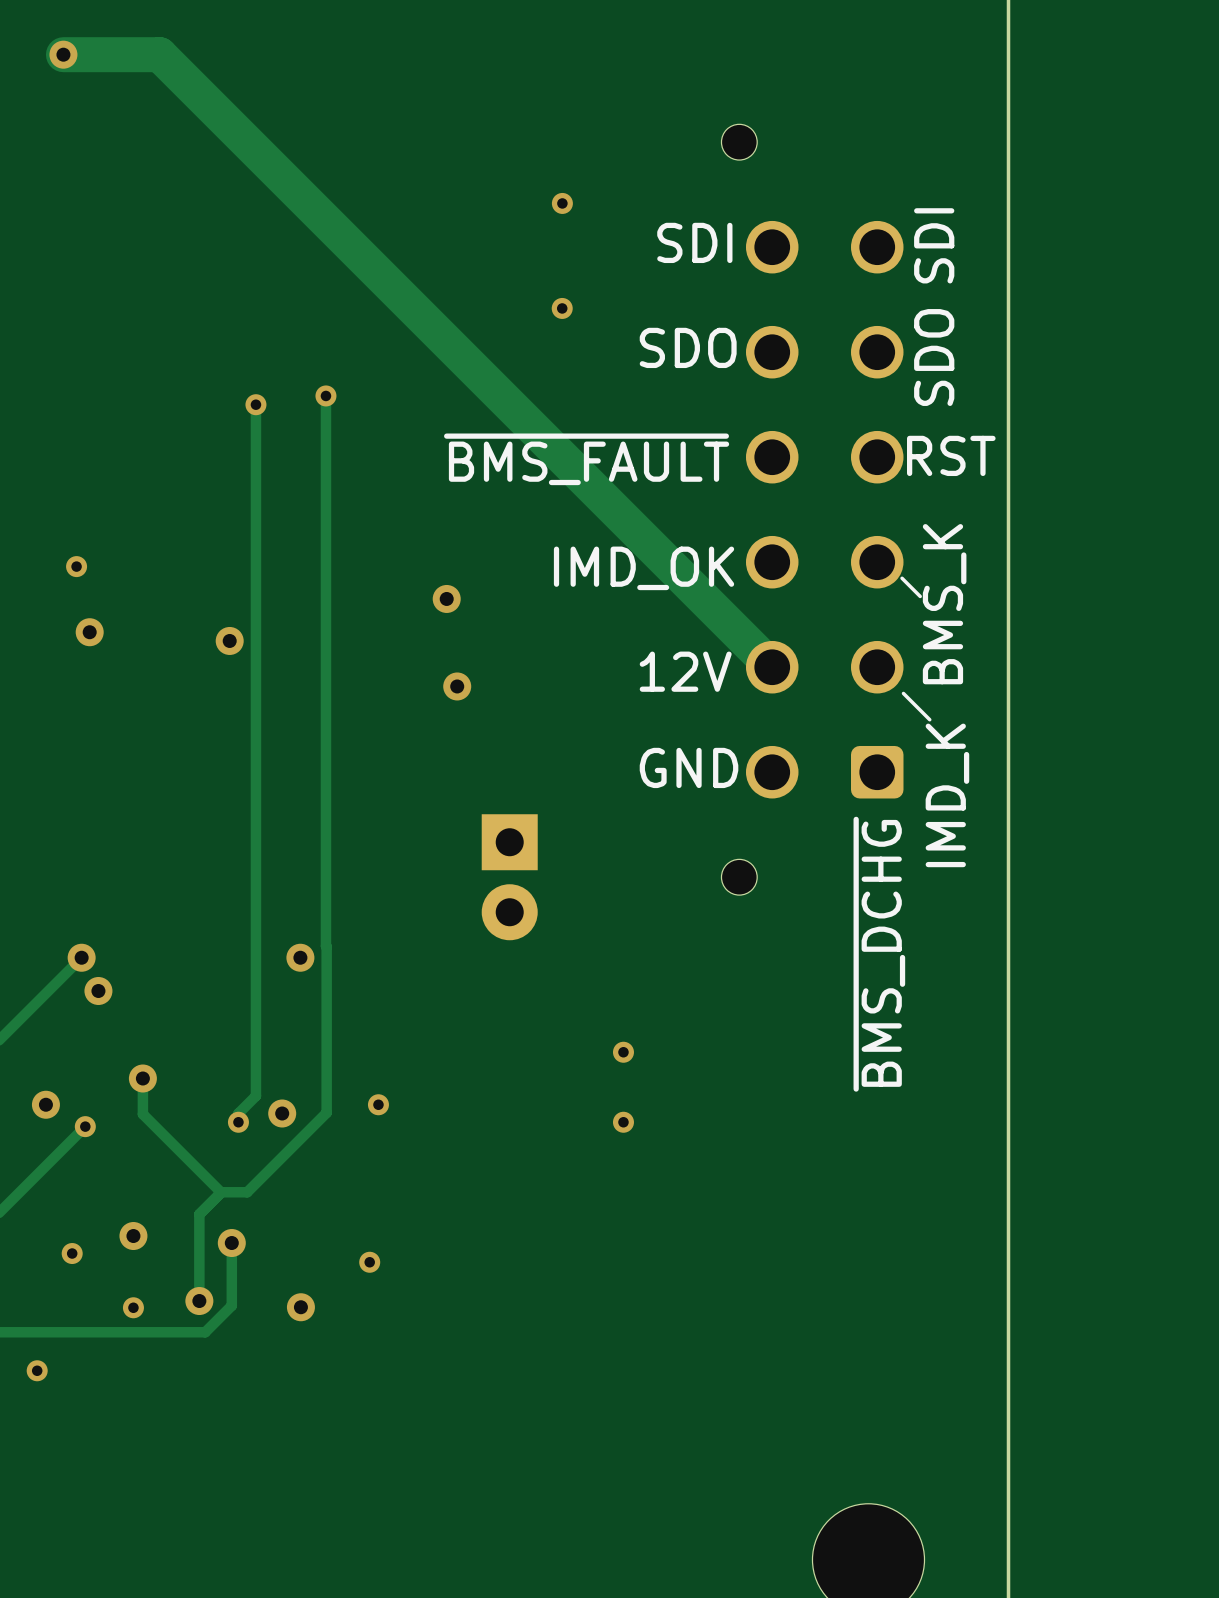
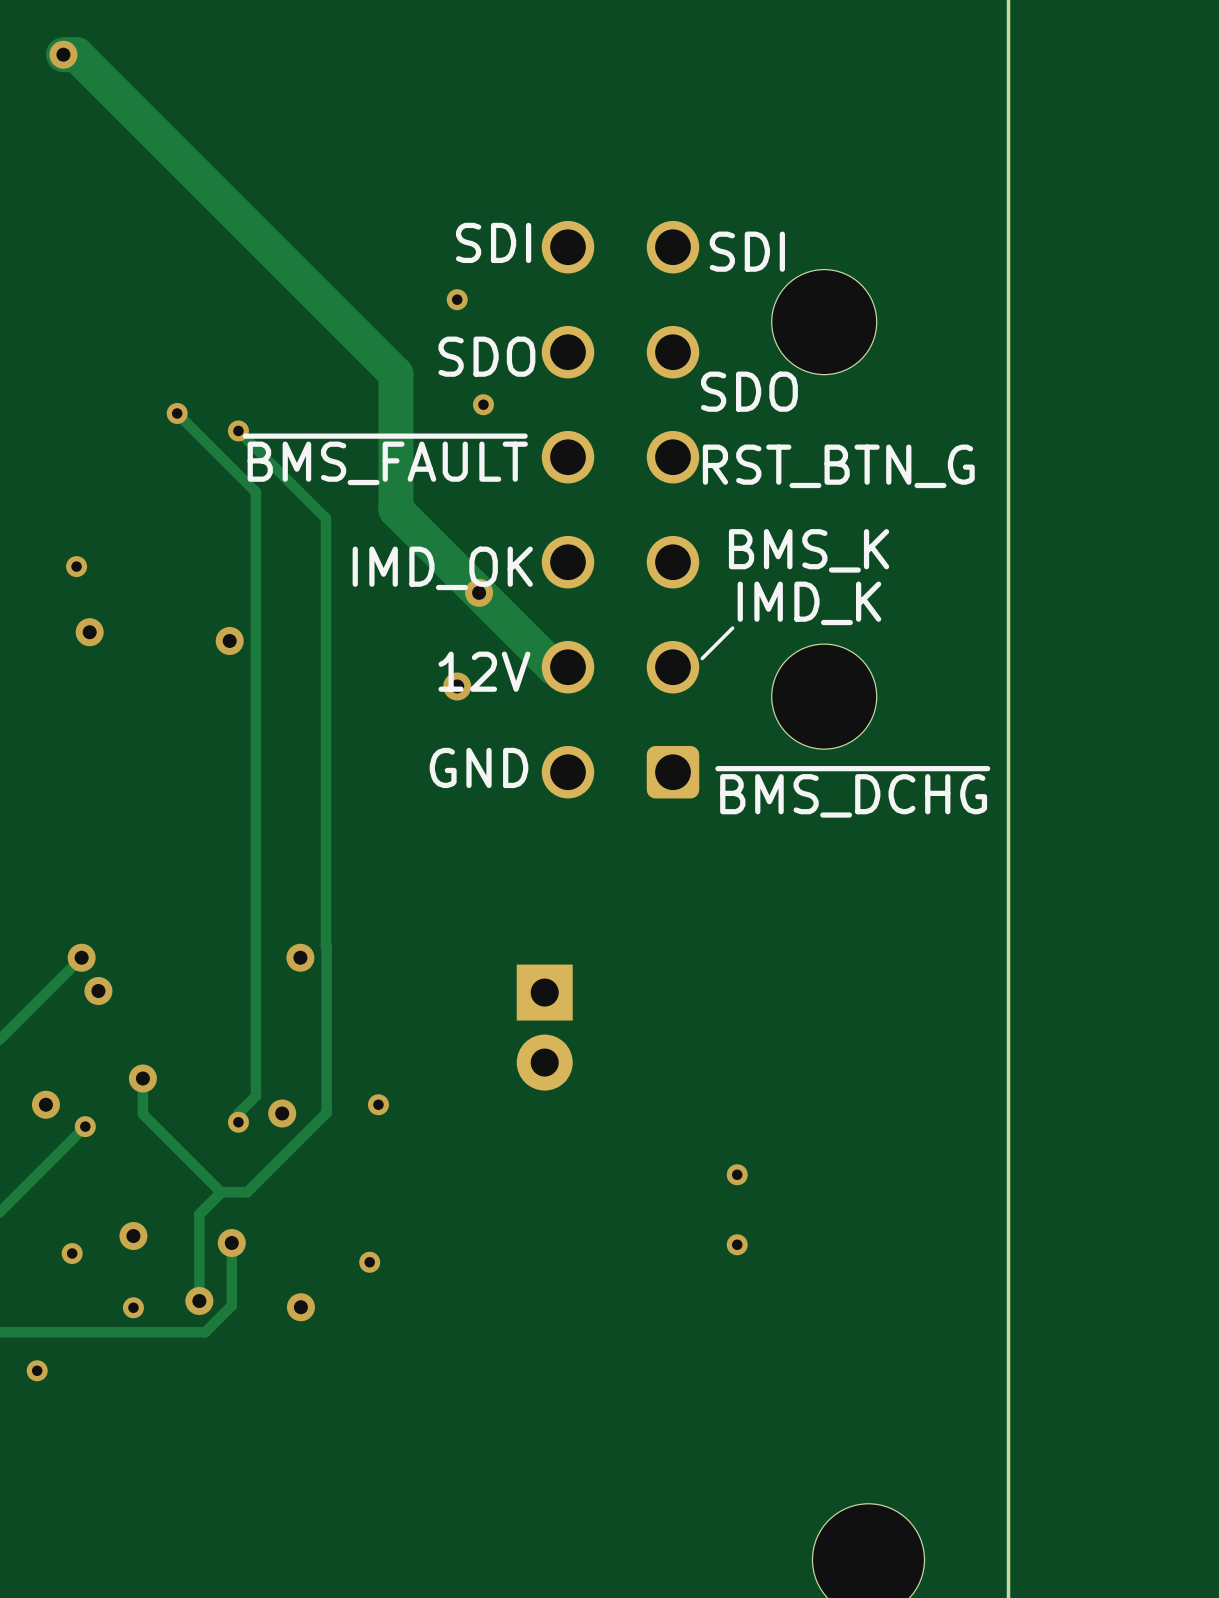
track: (76, 54) (159, 54) (772, 667) -> (76, 54) (395, 374) (395, 509) (553, 667) (568, 667)
via: (562, 203) -> none
text: none -> SDI (493, 242)
text position: SDI (694, 242) -> SDI (747, 251)
text: SDI (934, 245) -> none
via: none -> (457, 299)
via: (562, 308) -> none
text position: SDO (688, 347) -> SDO (749, 391)
text: none -> SDO (486, 356)
text: SDO (934, 357) -> none
track: (325, 395) (325, 518) -> (238, 430) (325, 518)
via: (325, 395) -> none
track: (255, 404) (255, 492) -> (177, 413) (255, 492)
via position: (255, 404) -> (238, 430)
via: none -> (483, 404)
via: none -> (177, 413)
text: RST (951, 455) -> RST_BTN_G (838, 466)
text position: ~{BMS_FAULT} (586, 459) -> ~{BMS_FAULT} (385, 459)
part: none -> (709, 509)
part: (812, 509) -> none
text position: IMD_OK (644, 568) -> IMD_OK (442, 568)
line: (902, 578) (920, 596) -> none
via position: (446, 598) -> (479, 592)
text rotation: 0° (944, 604) -> 90° clockwise (809, 550)
line: none -> (732, 628) (702, 658)
text position: 12V (685, 671) -> 12V (484, 671)
line: (903, 693) (929, 719) -> none
text position: GND (689, 767) -> GND (479, 767)
text rotation: 0° (947, 795) -> 90° clockwise (809, 603)
text position: IMD_K (947, 795) -> IMD_K (809, 603)
part position: (509, 877) -> (544, 1027)
text rotation: 0° (879, 954) -> 90° clockwise (852, 791)
via: (623, 1052) -> none
via: (623, 1122) -> none
via: none -> (737, 1174)
via: none -> (737, 1244)

